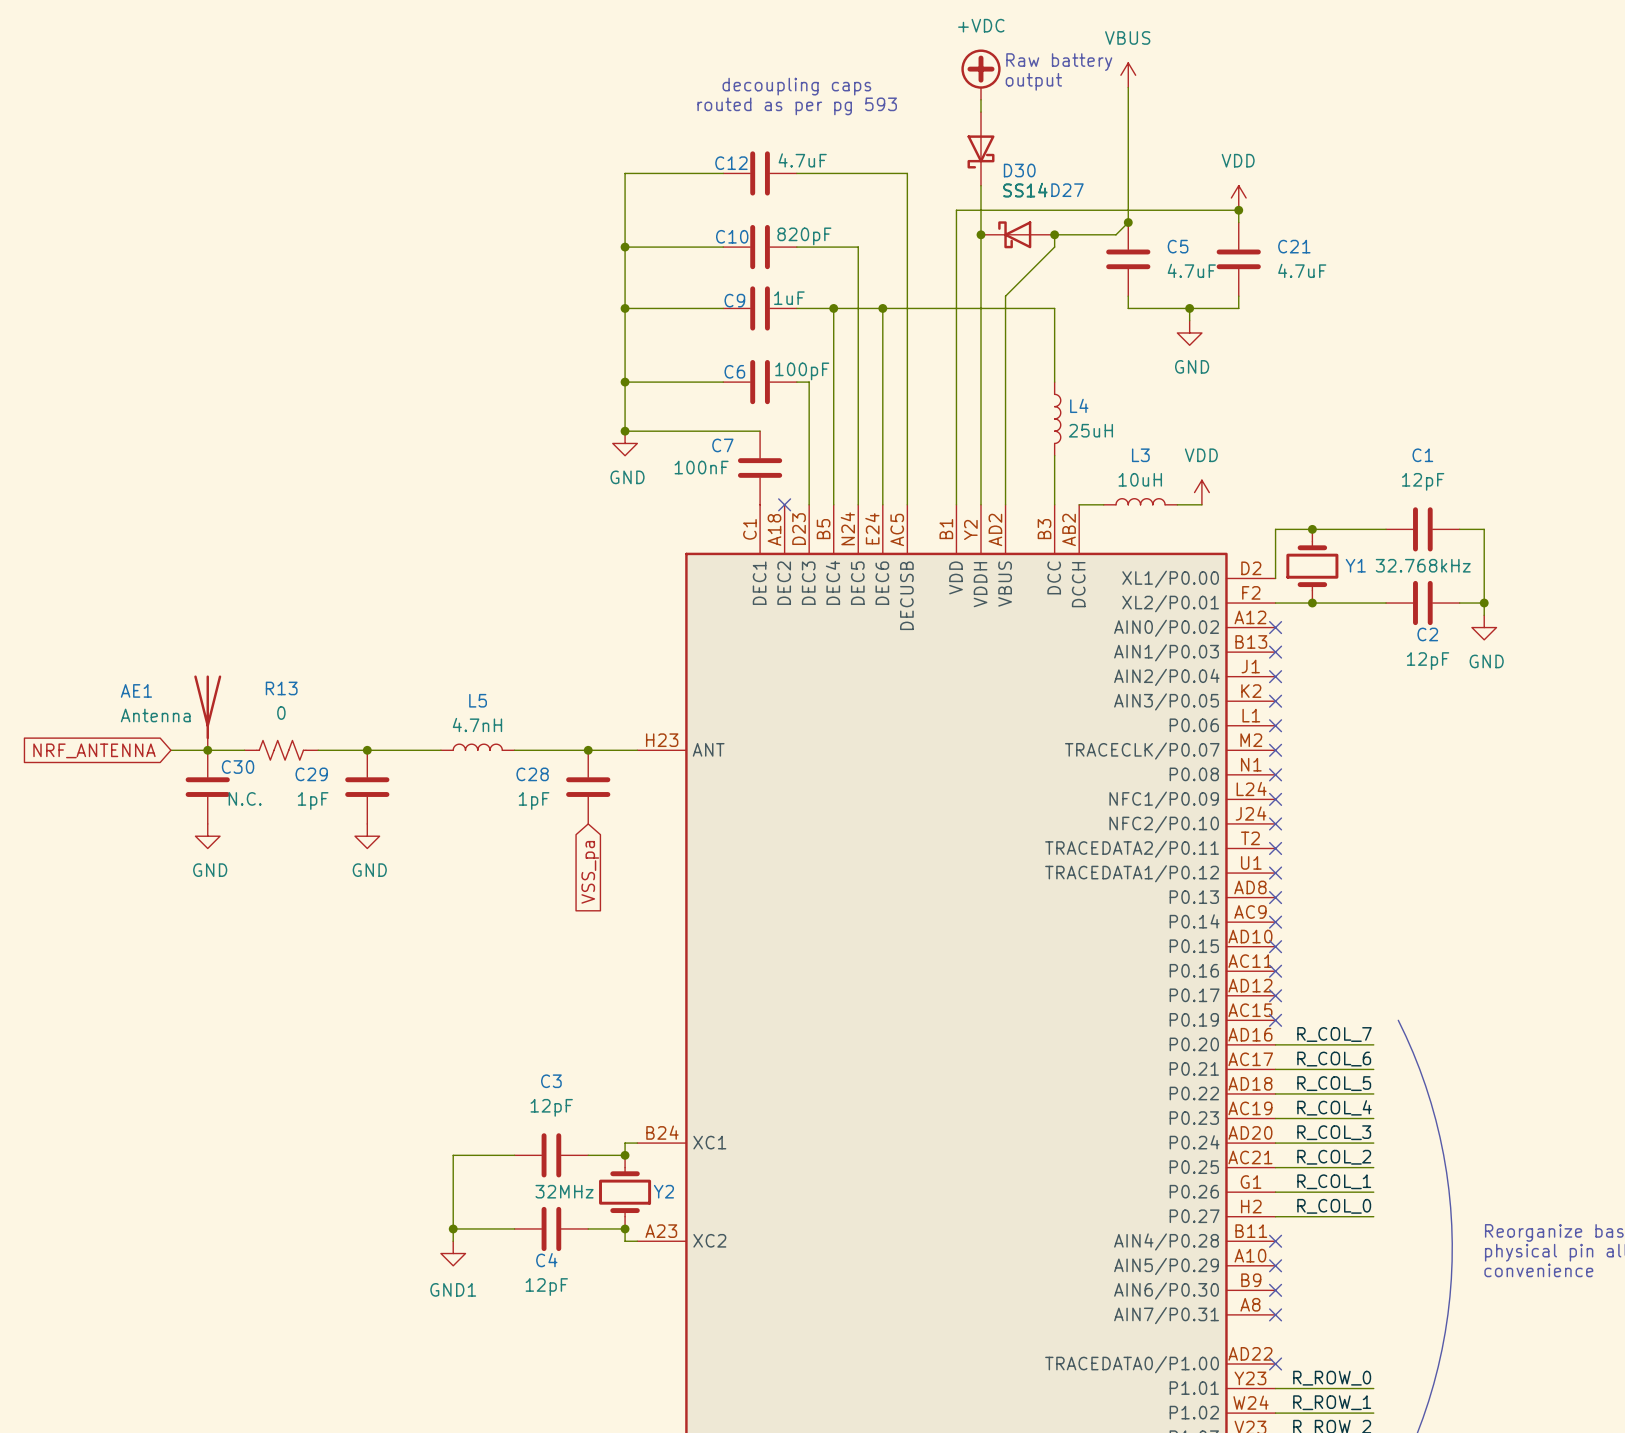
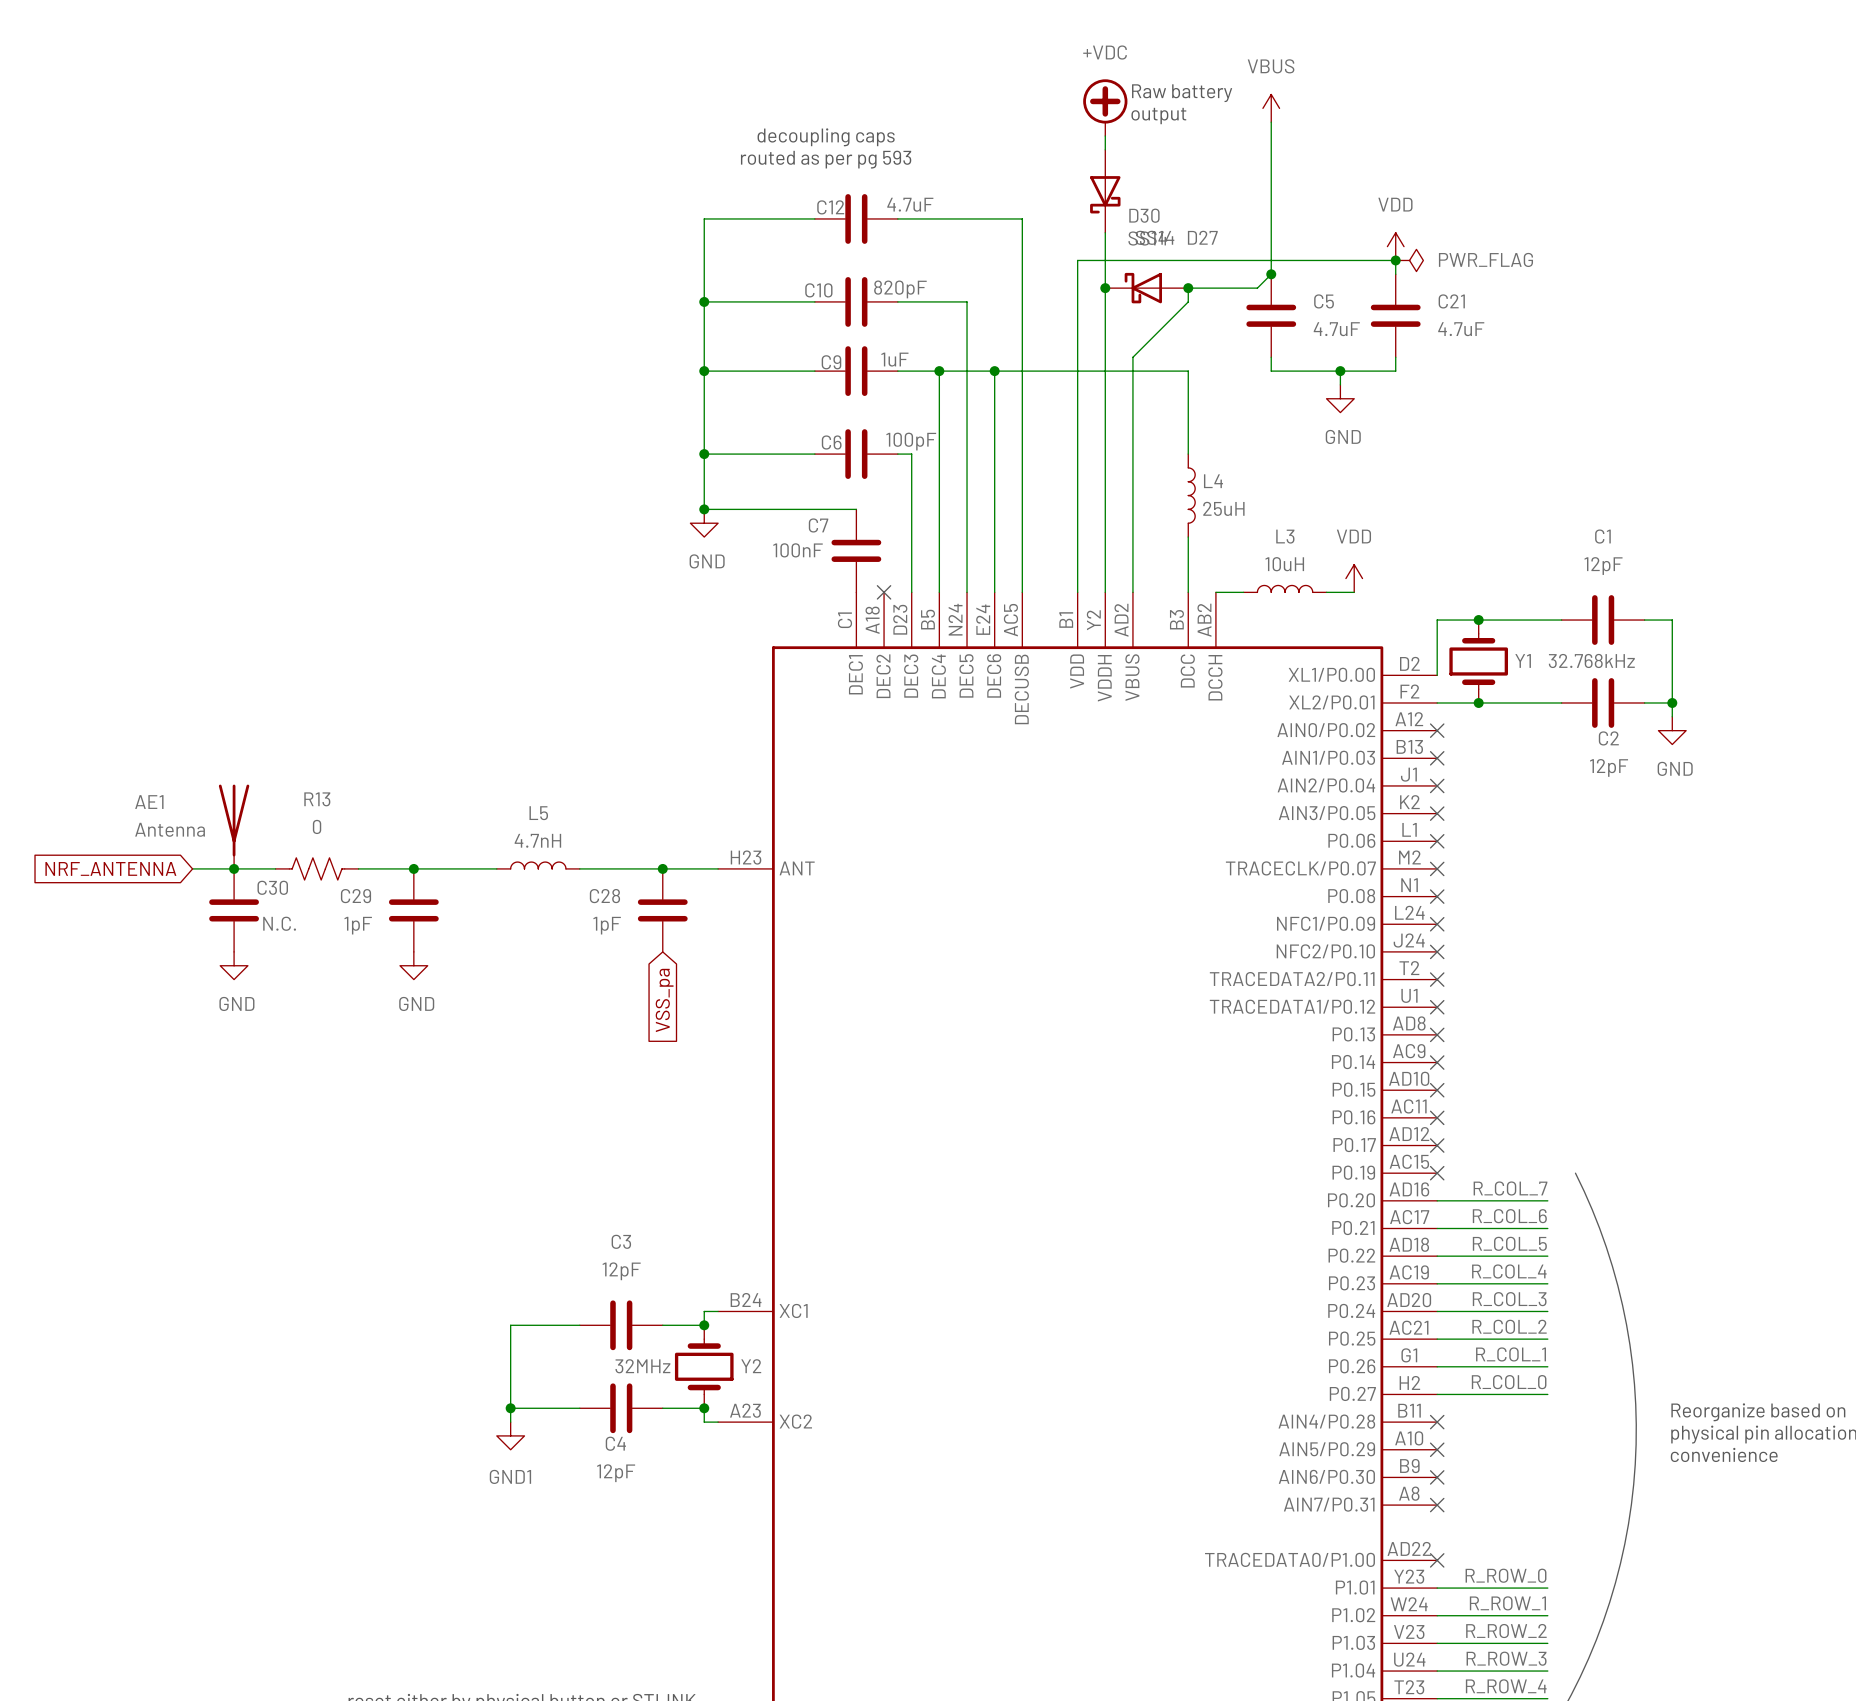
text position: decoupling caps (796, 86) -> decoupling caps (826, 137)
text position: routed as per pg 593 (797, 106) -> routed as per pg 593 (826, 159)
power symbol: none -> PWR_FLAG (1409, 260)

